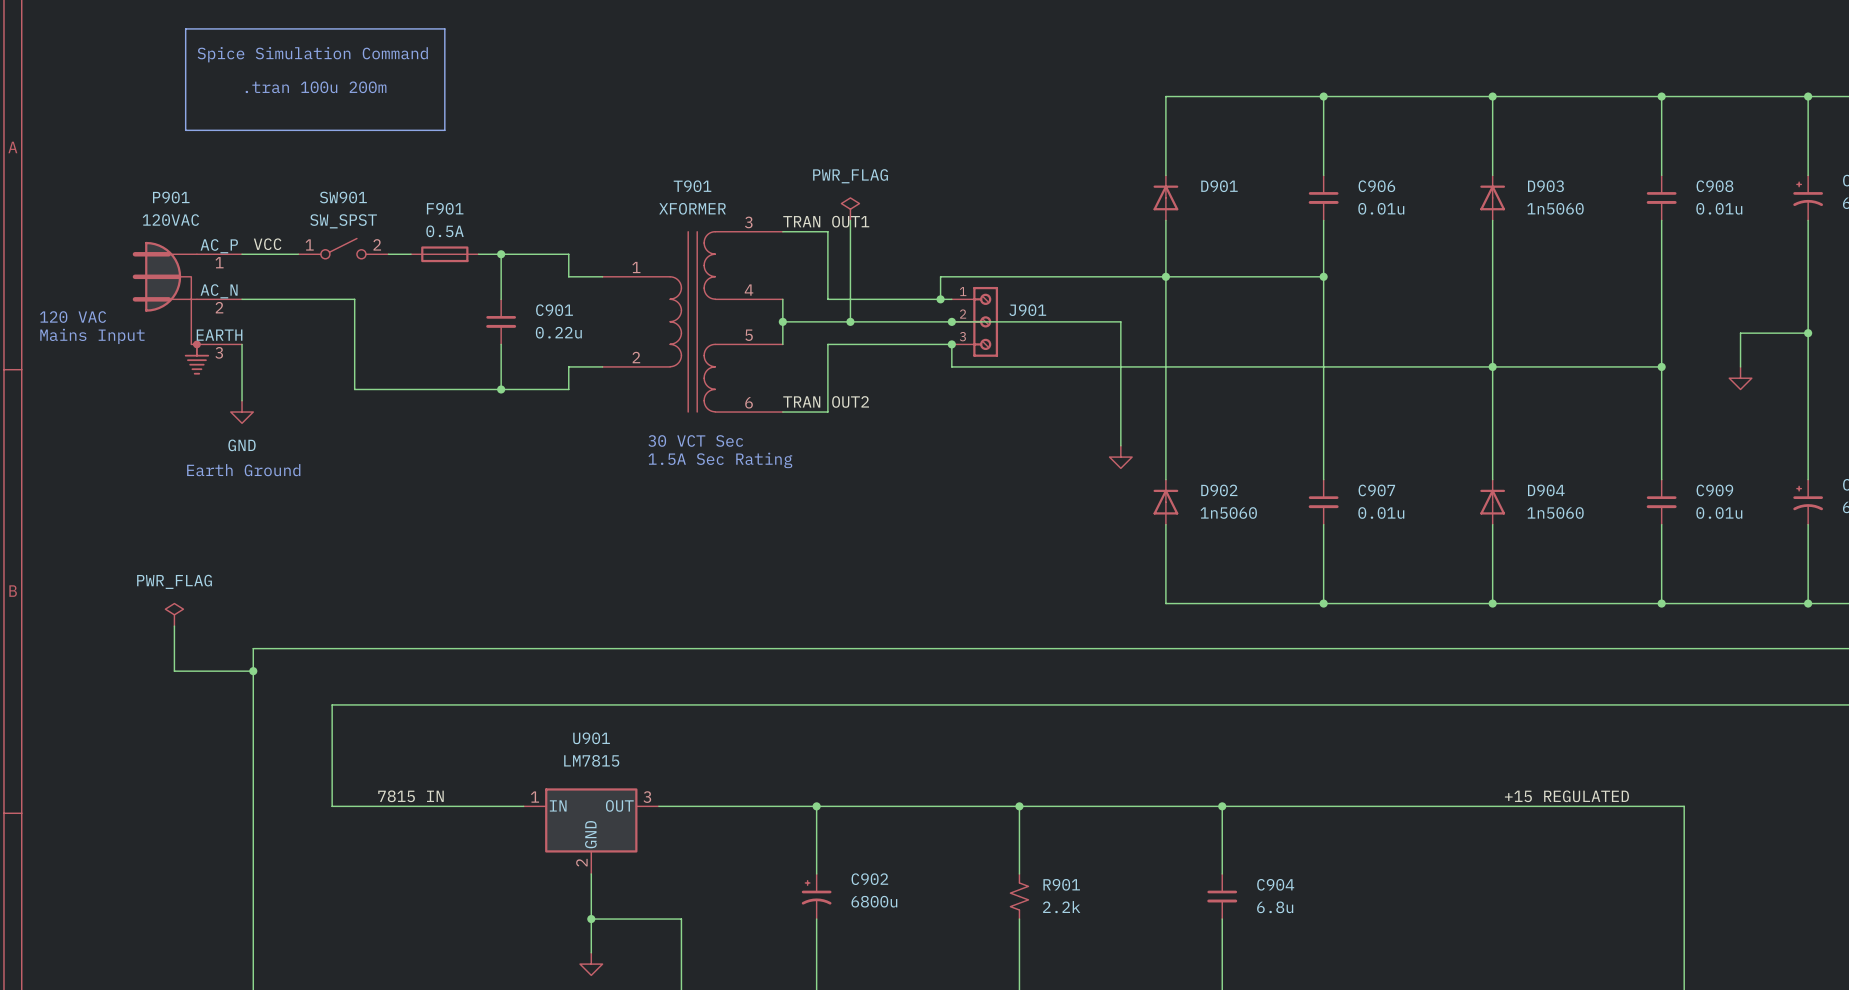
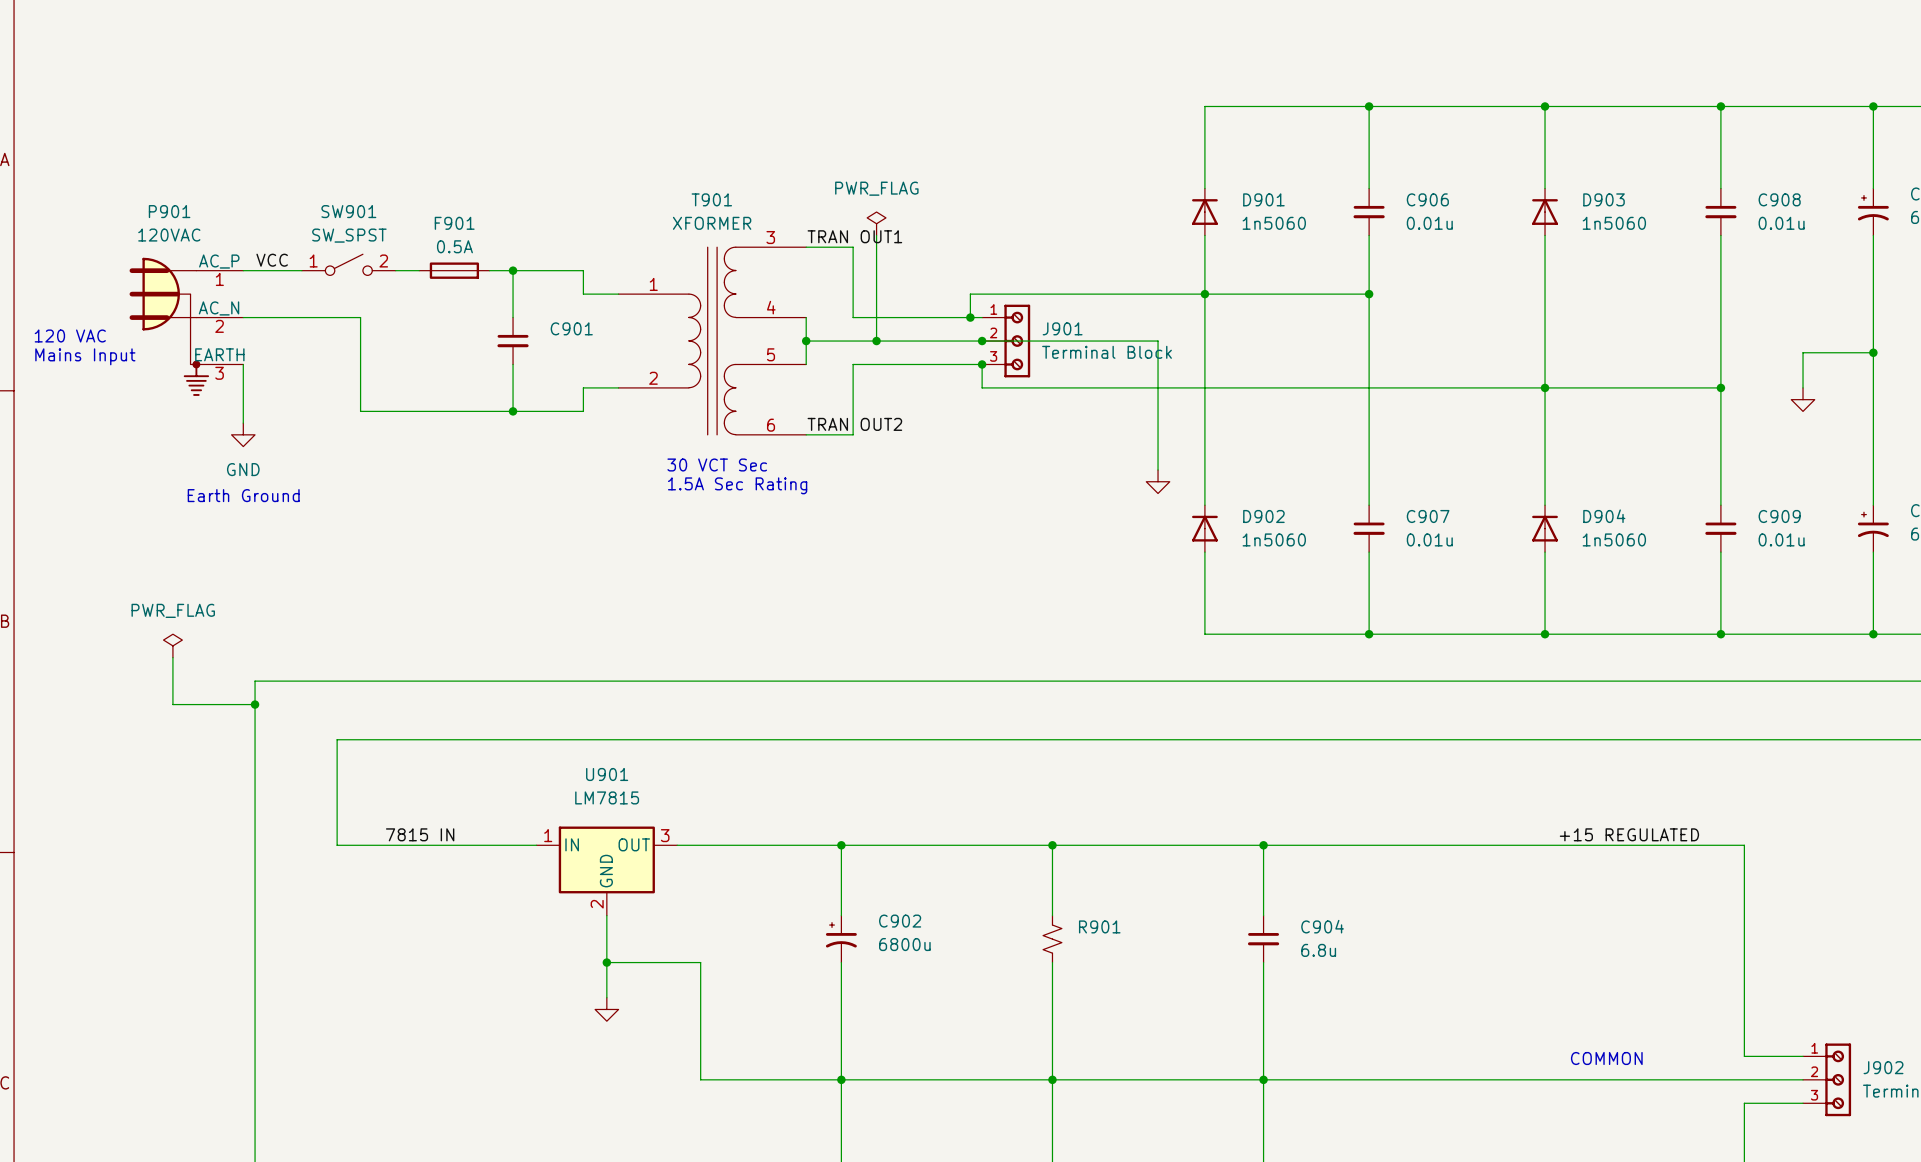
line: (185, 28) (444, 28) (444, 130) (185, 130) (185, 28) -> none
text: Spice Simulation Command (312, 54) -> none
text: .tran 100u 200m (316, 87) -> none
D901 value: none -> 1n5060 (1274, 223)
C901 value: 0.22u (558, 332) -> none
J901 value: none -> Terminal Block (1107, 352)
R901 value: 2.2k (1061, 907) -> none

